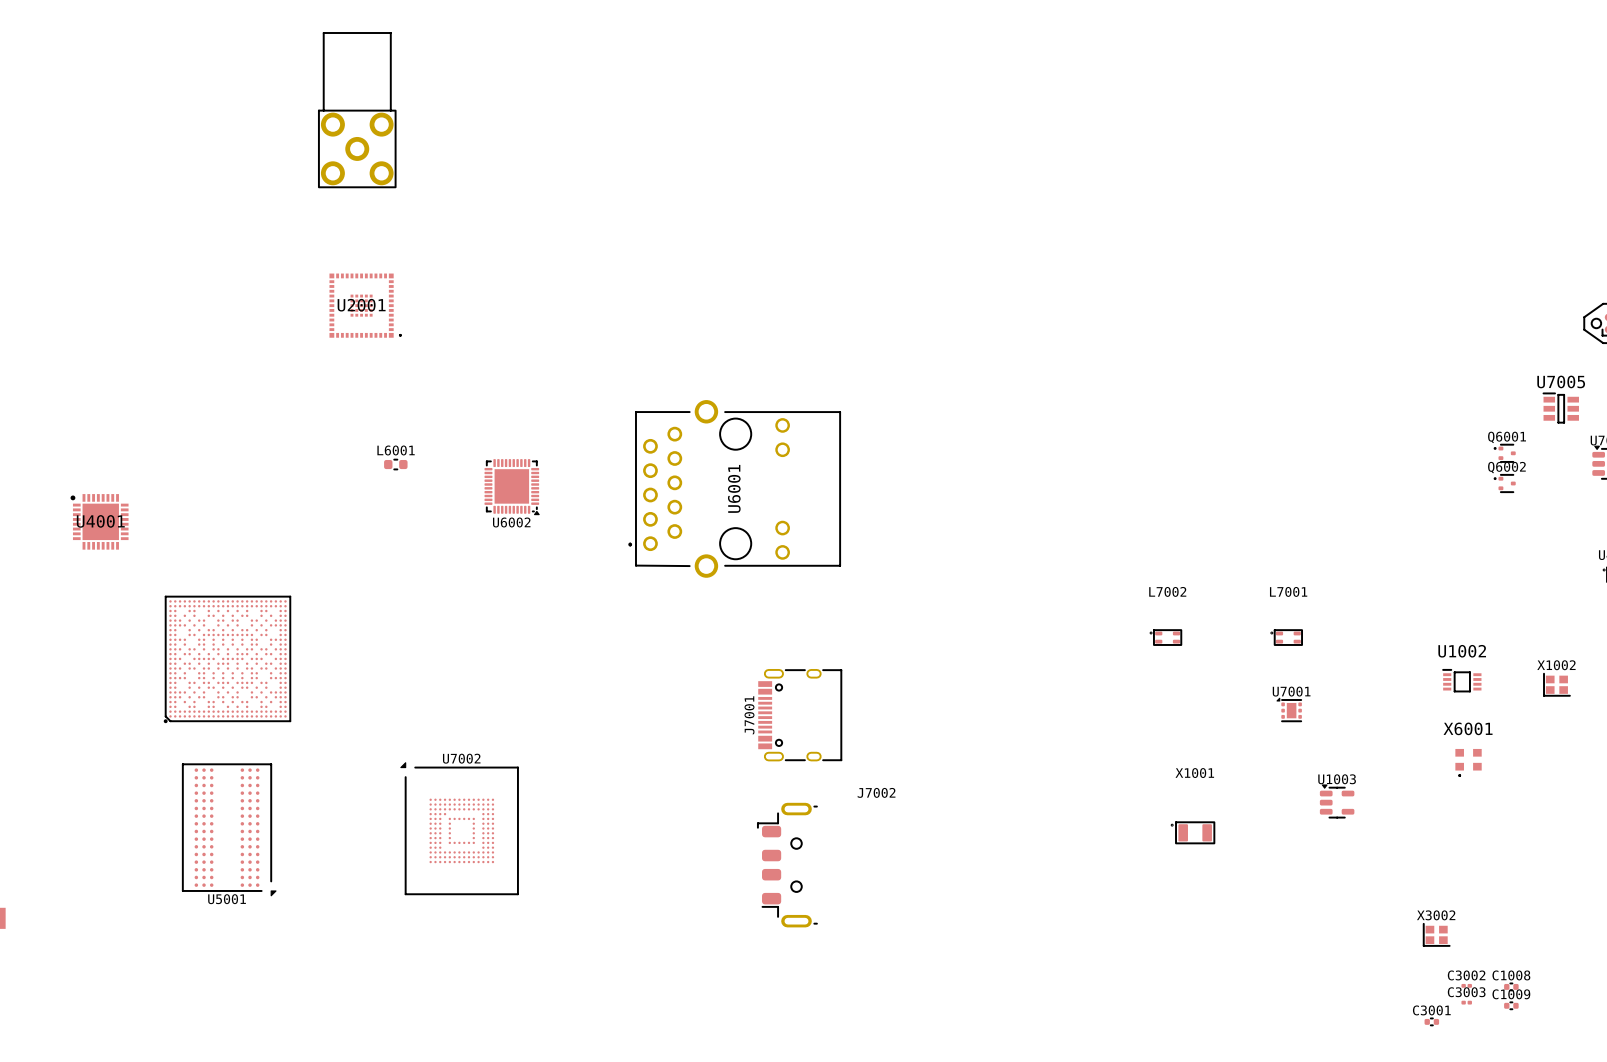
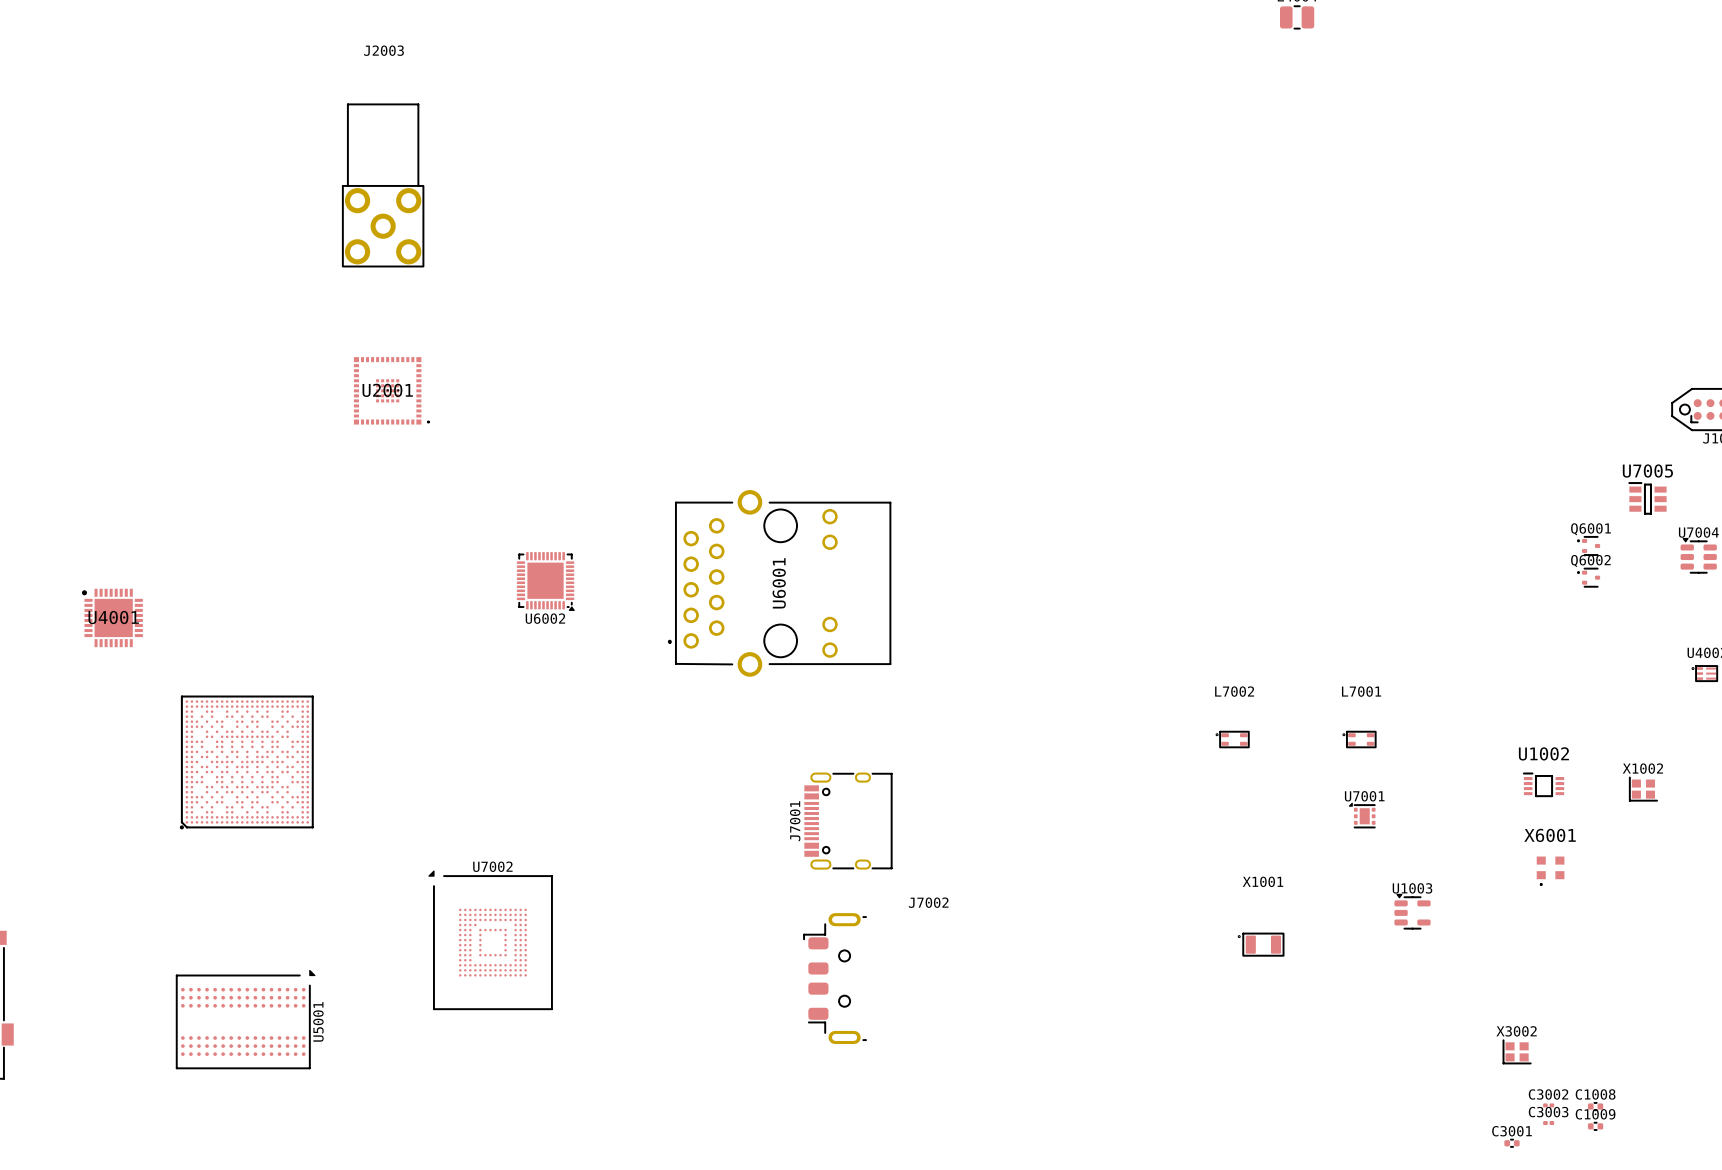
L6001: (395, 464) -> none
U5001 rotation: 0° (229, 830) -> 90° counterclockwise (245, 1019)

